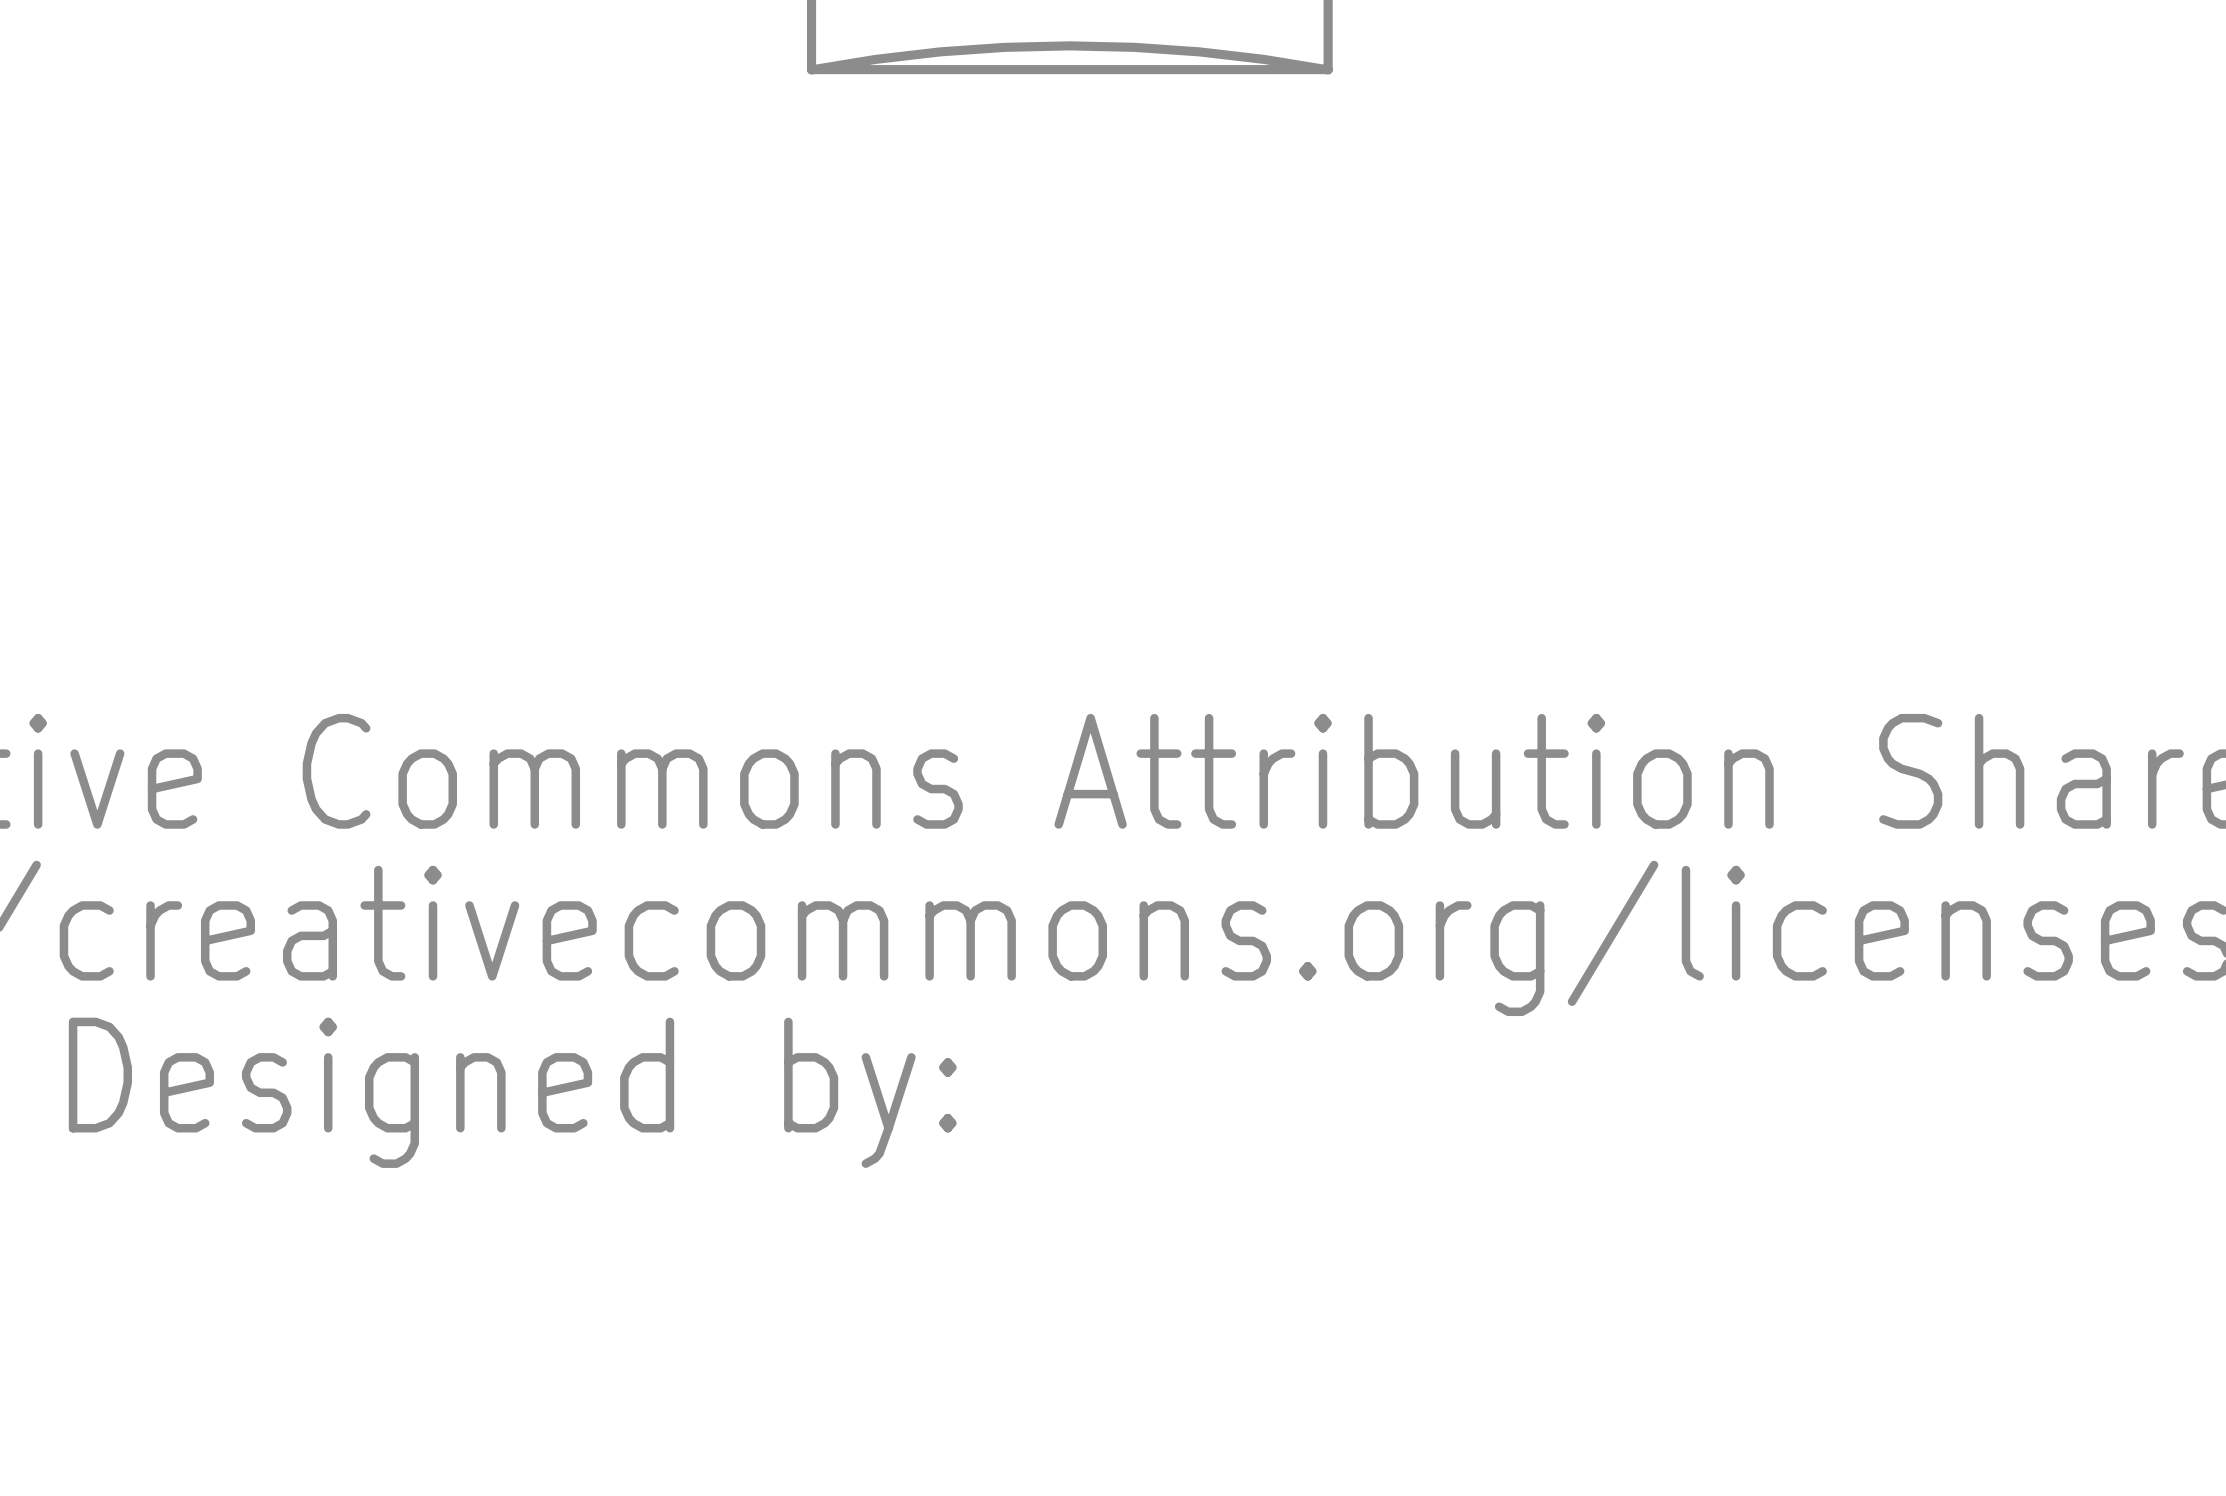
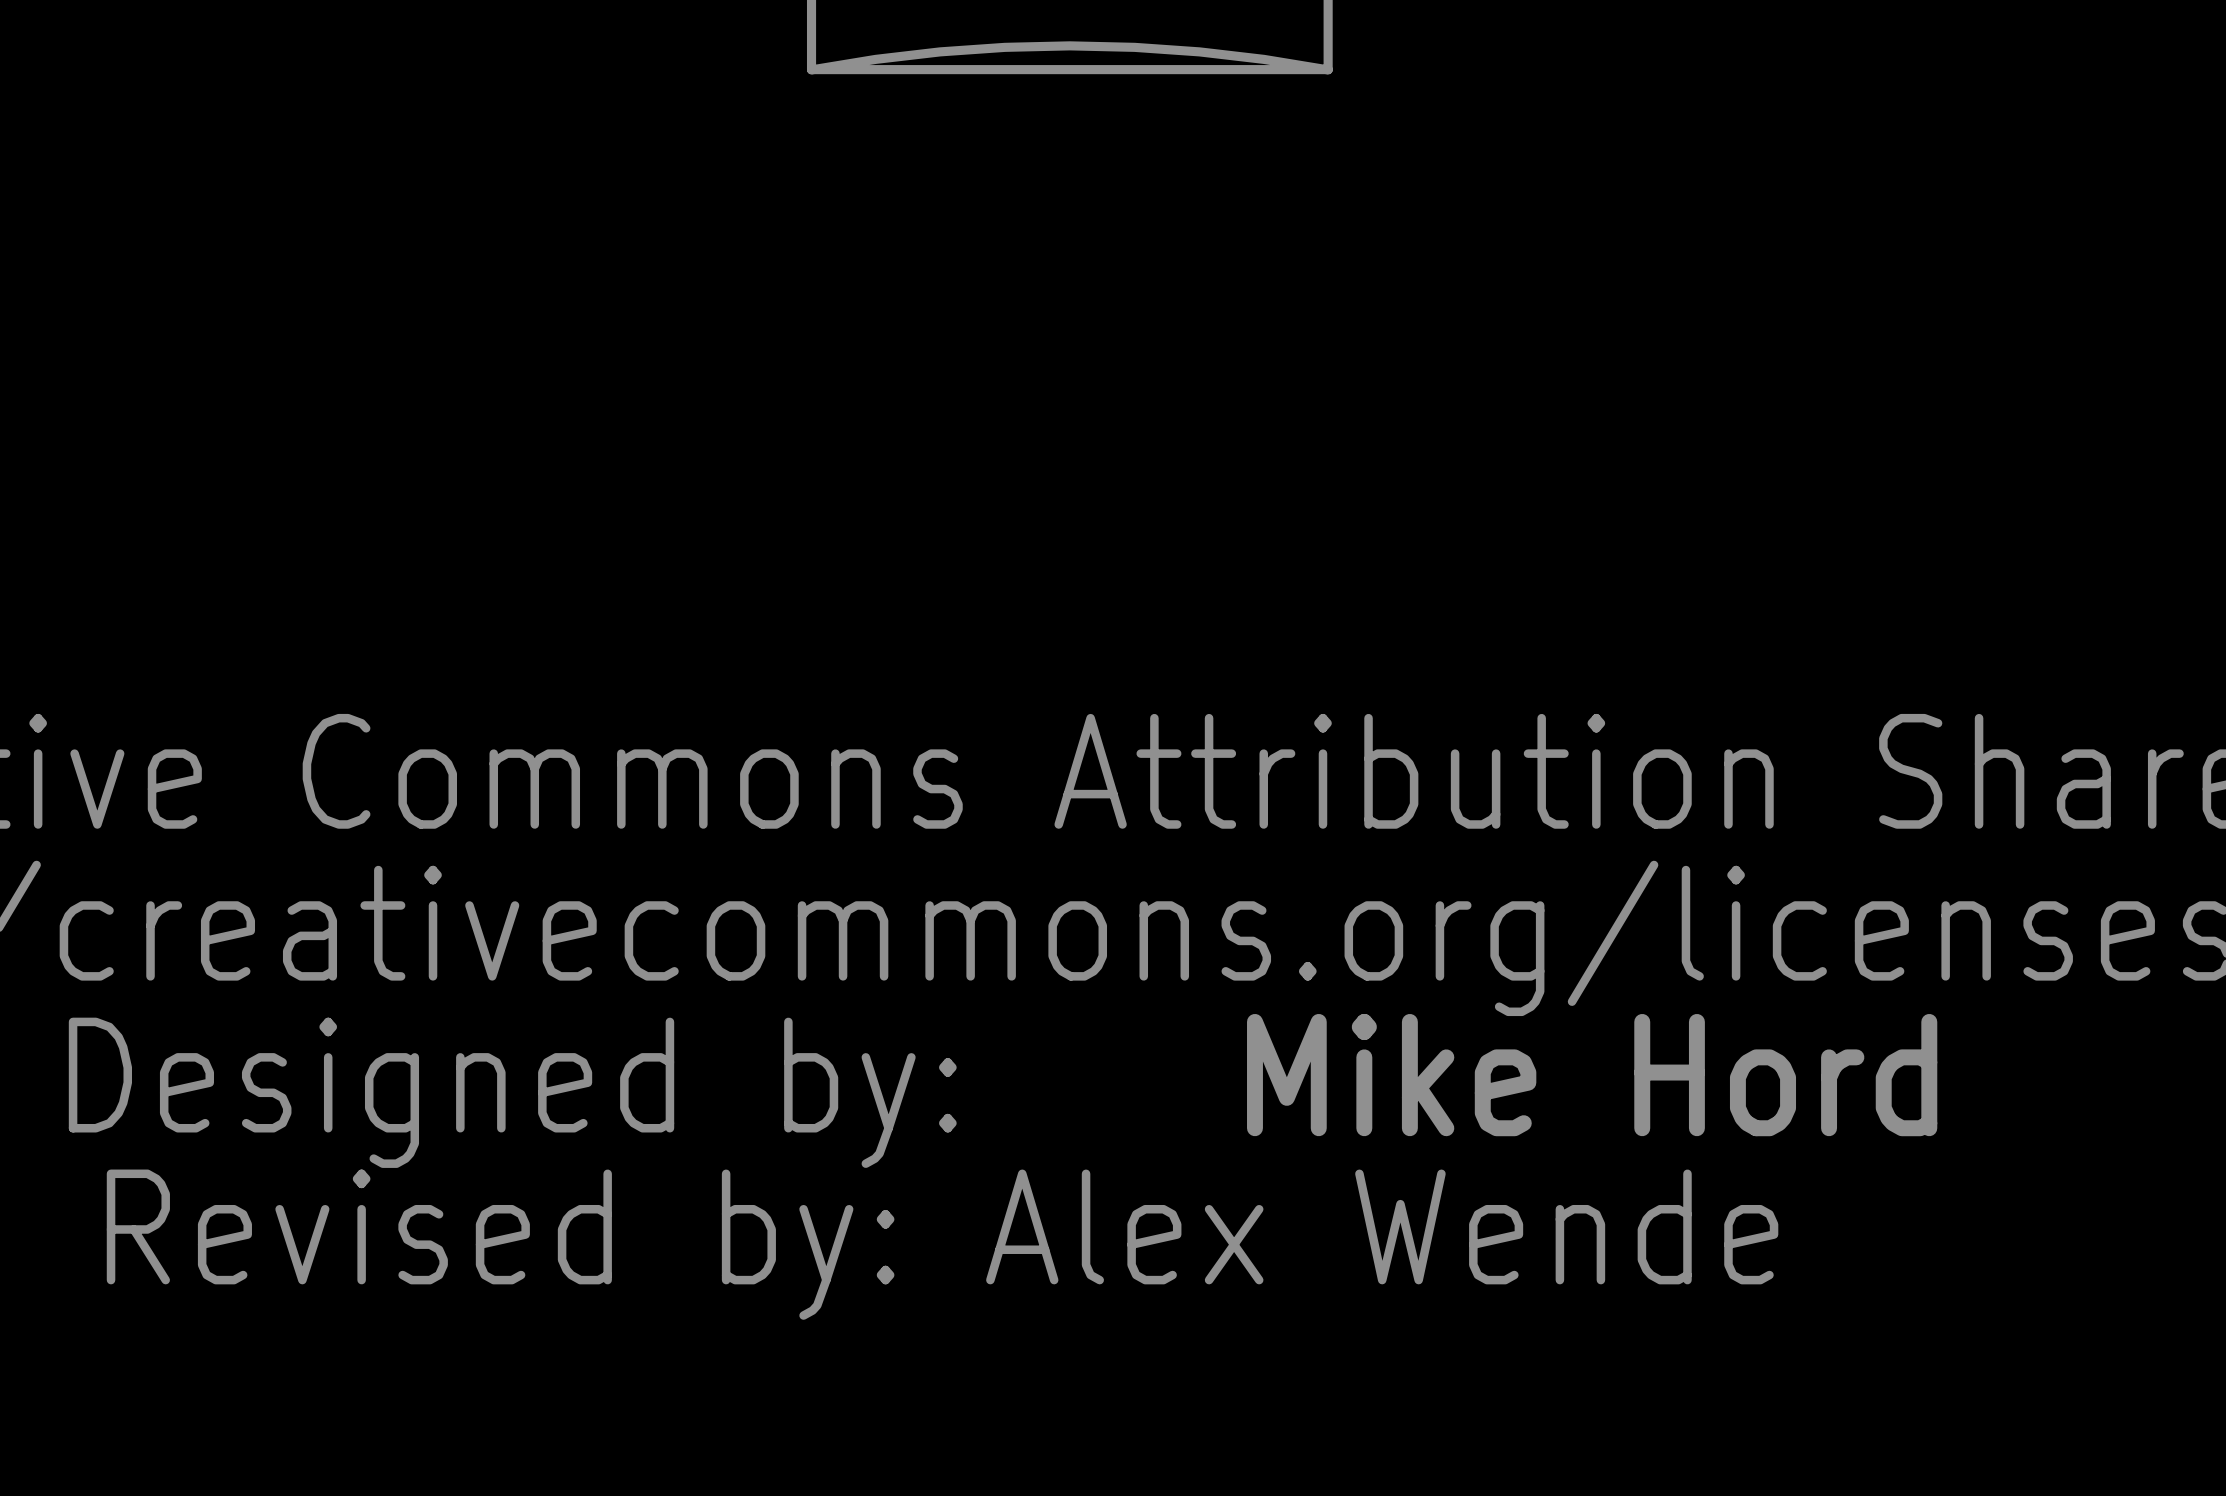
text: none -> Mike Hord (1592, 1075)
text: none -> Revised by: Alex Wende (942, 1244)

